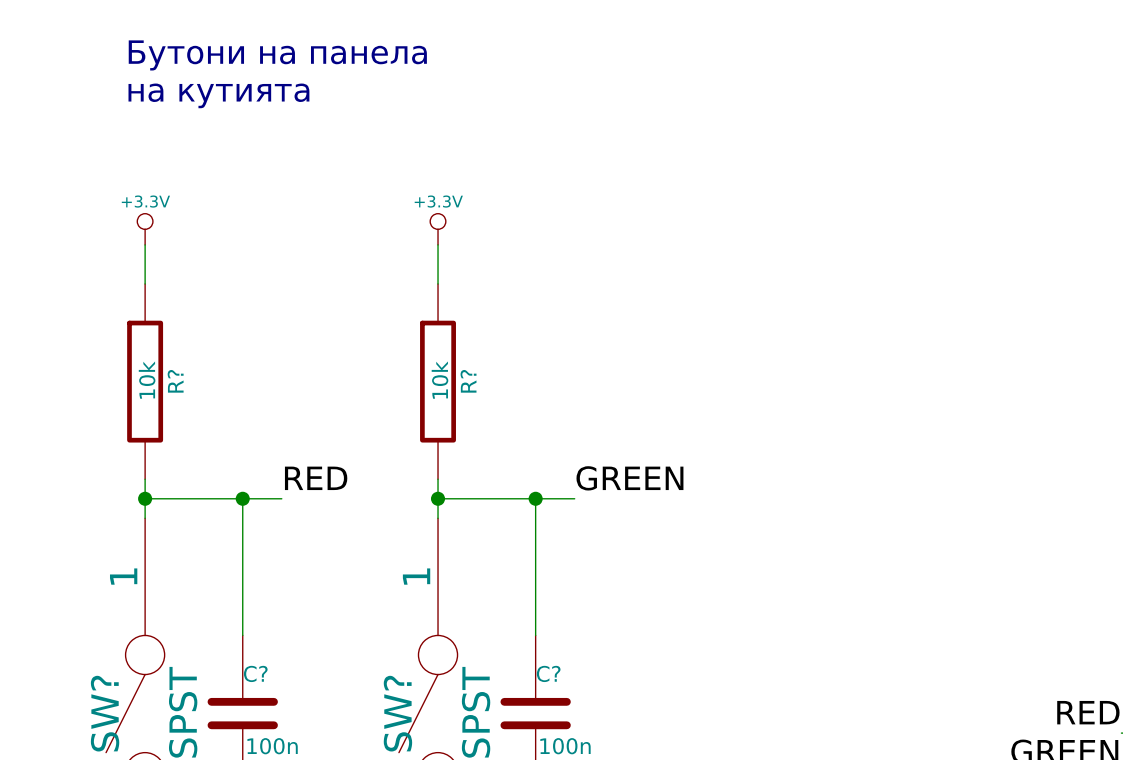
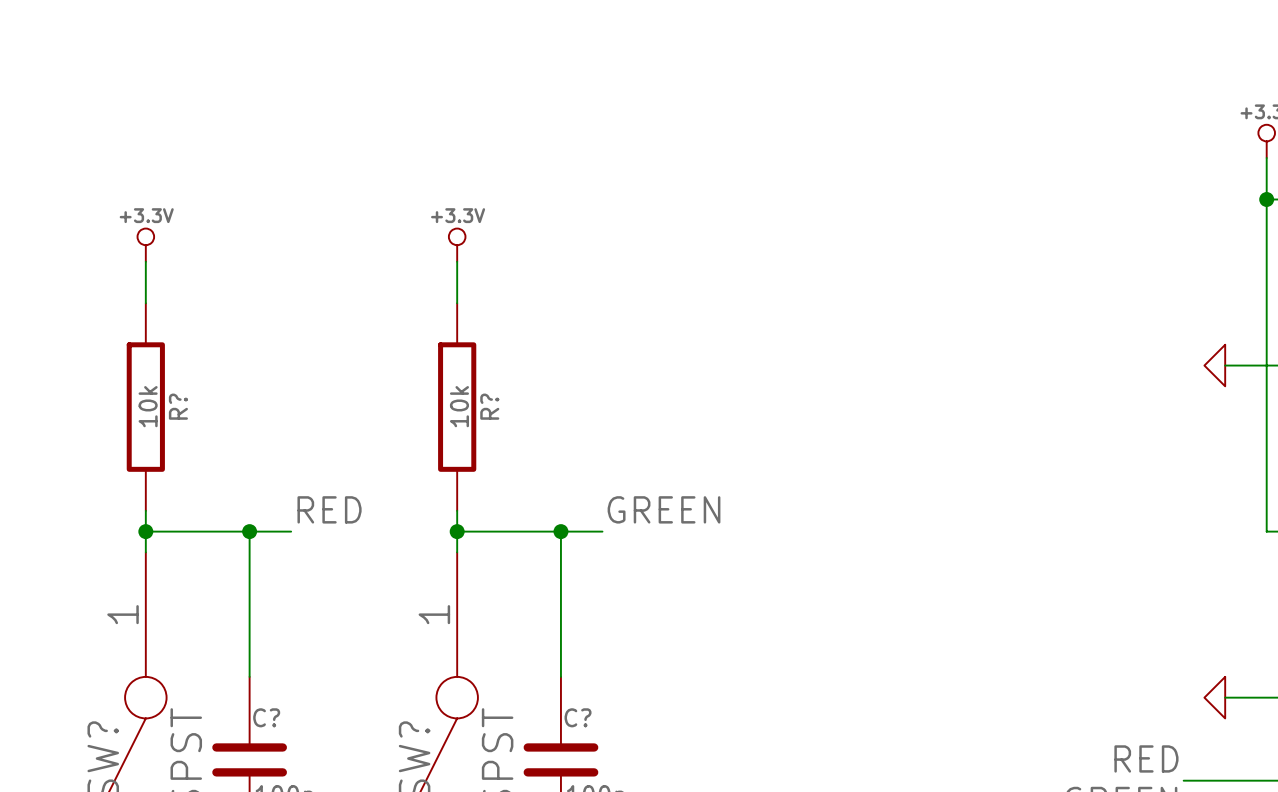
text: Бутони на панела (277, 55) -> none
text: на кутията (218, 95) -> none

